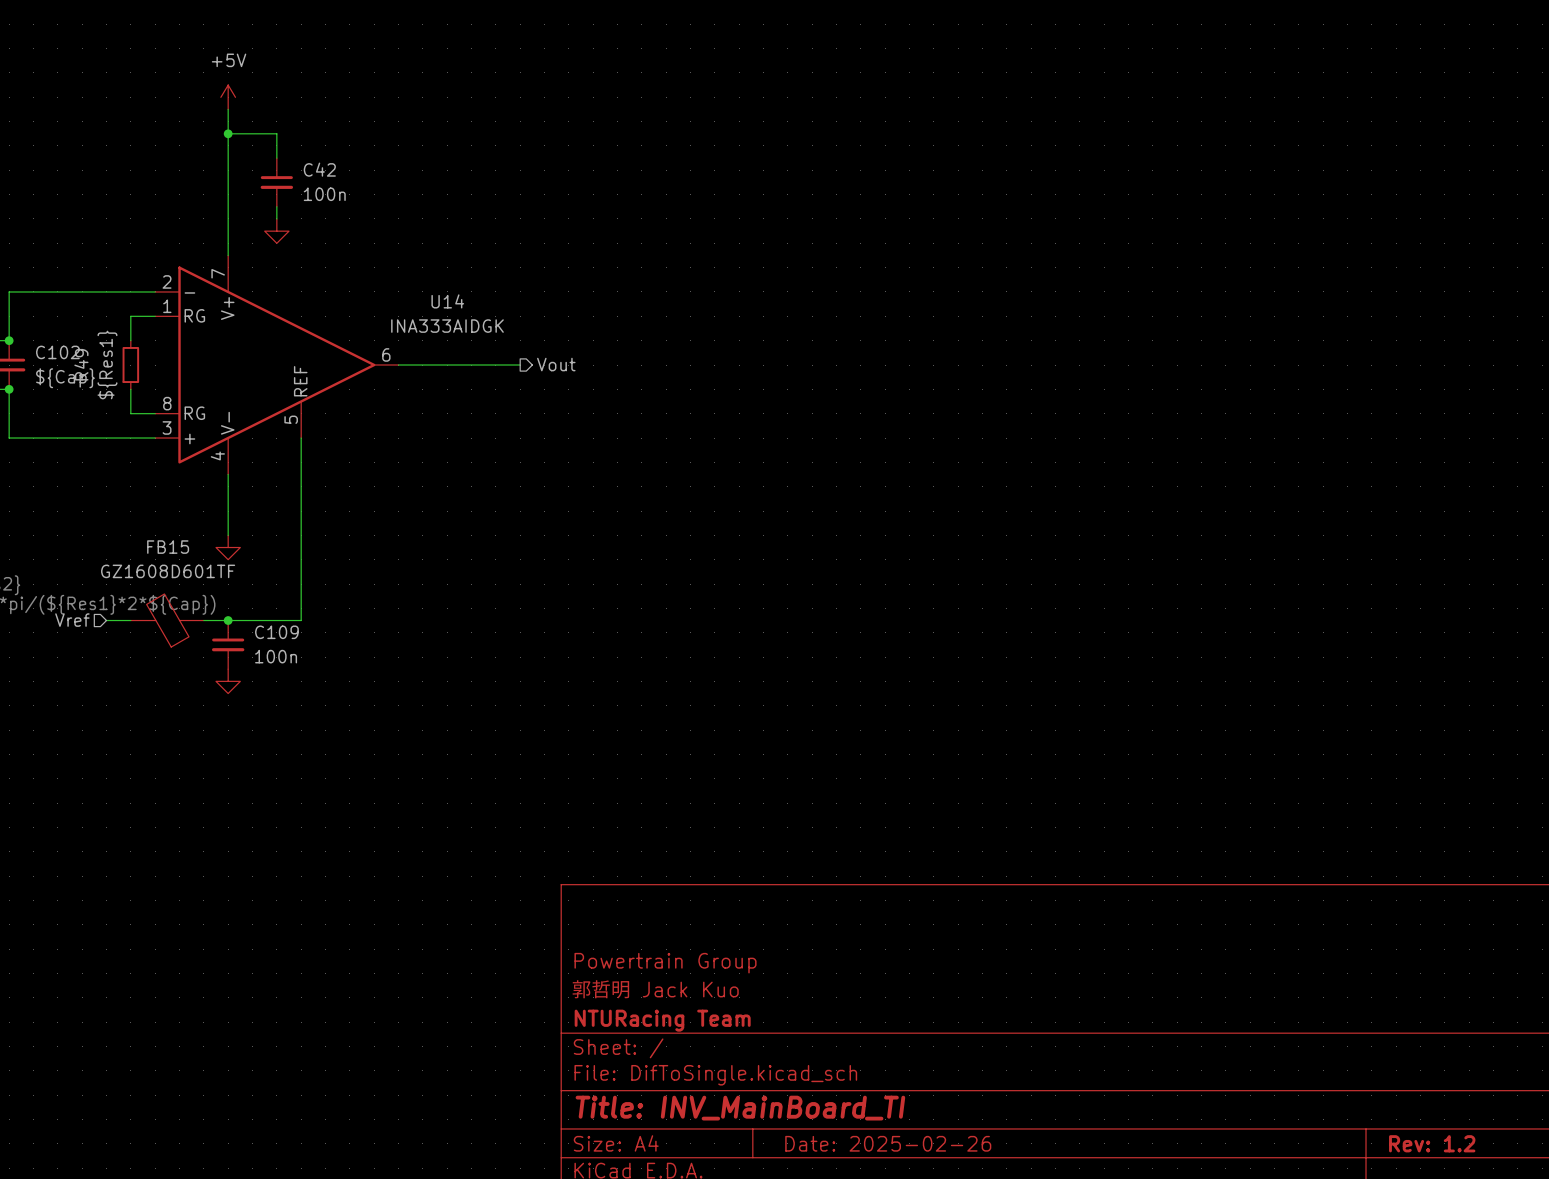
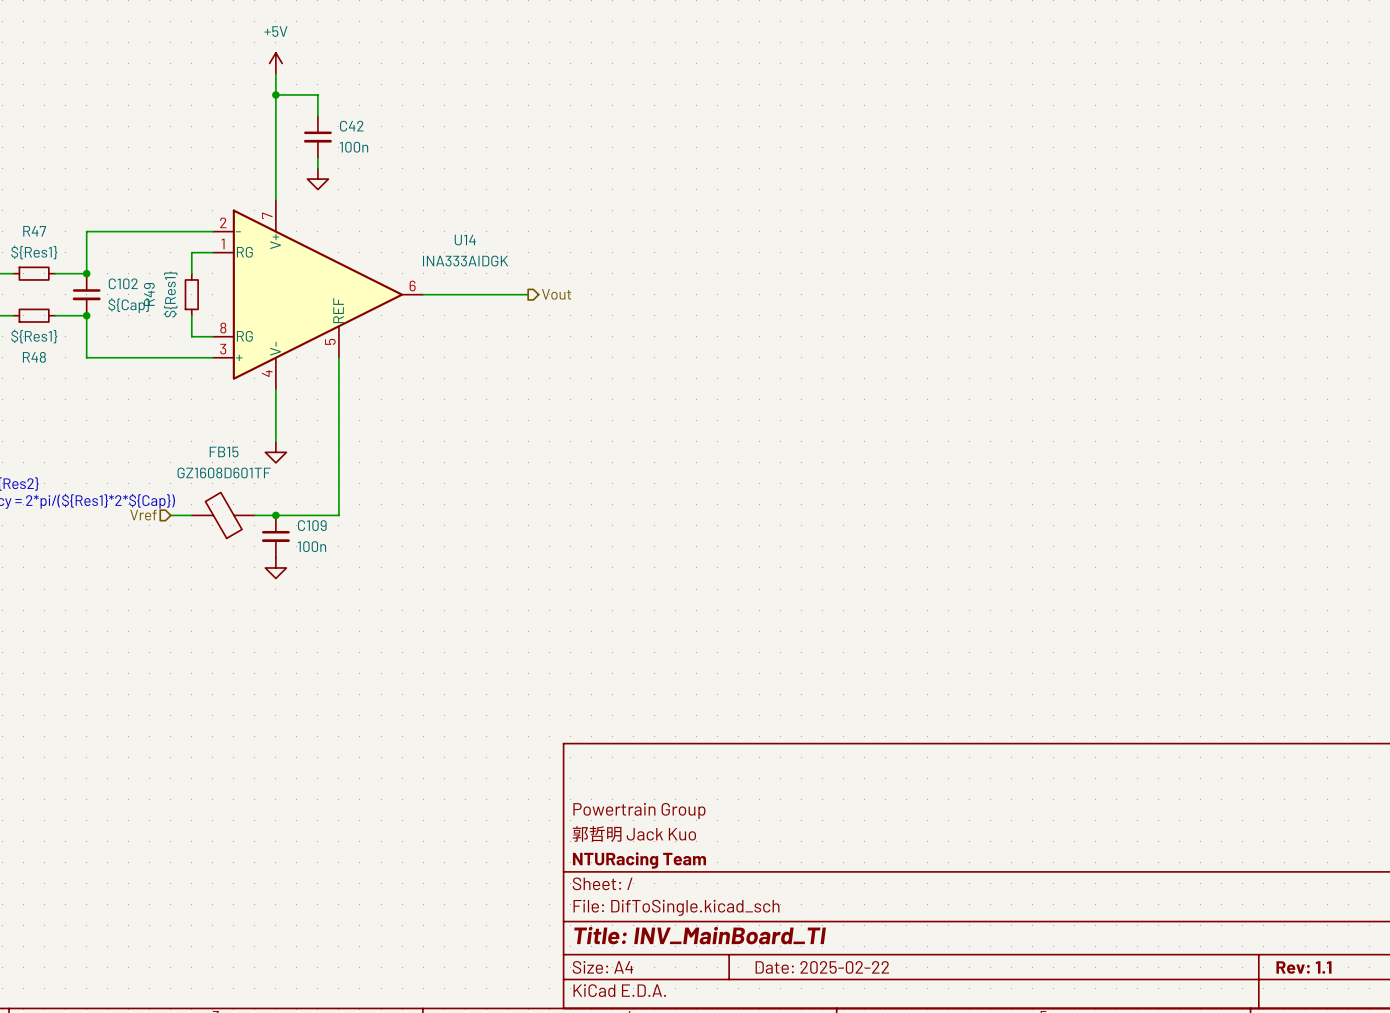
title block: Date: 2025-02-26 (888, 1143) -> Date: 2025-02-22 (822, 967)
title block: Rev: 1.2 (1432, 1143) -> Rev: 1.1 (1303, 967)

